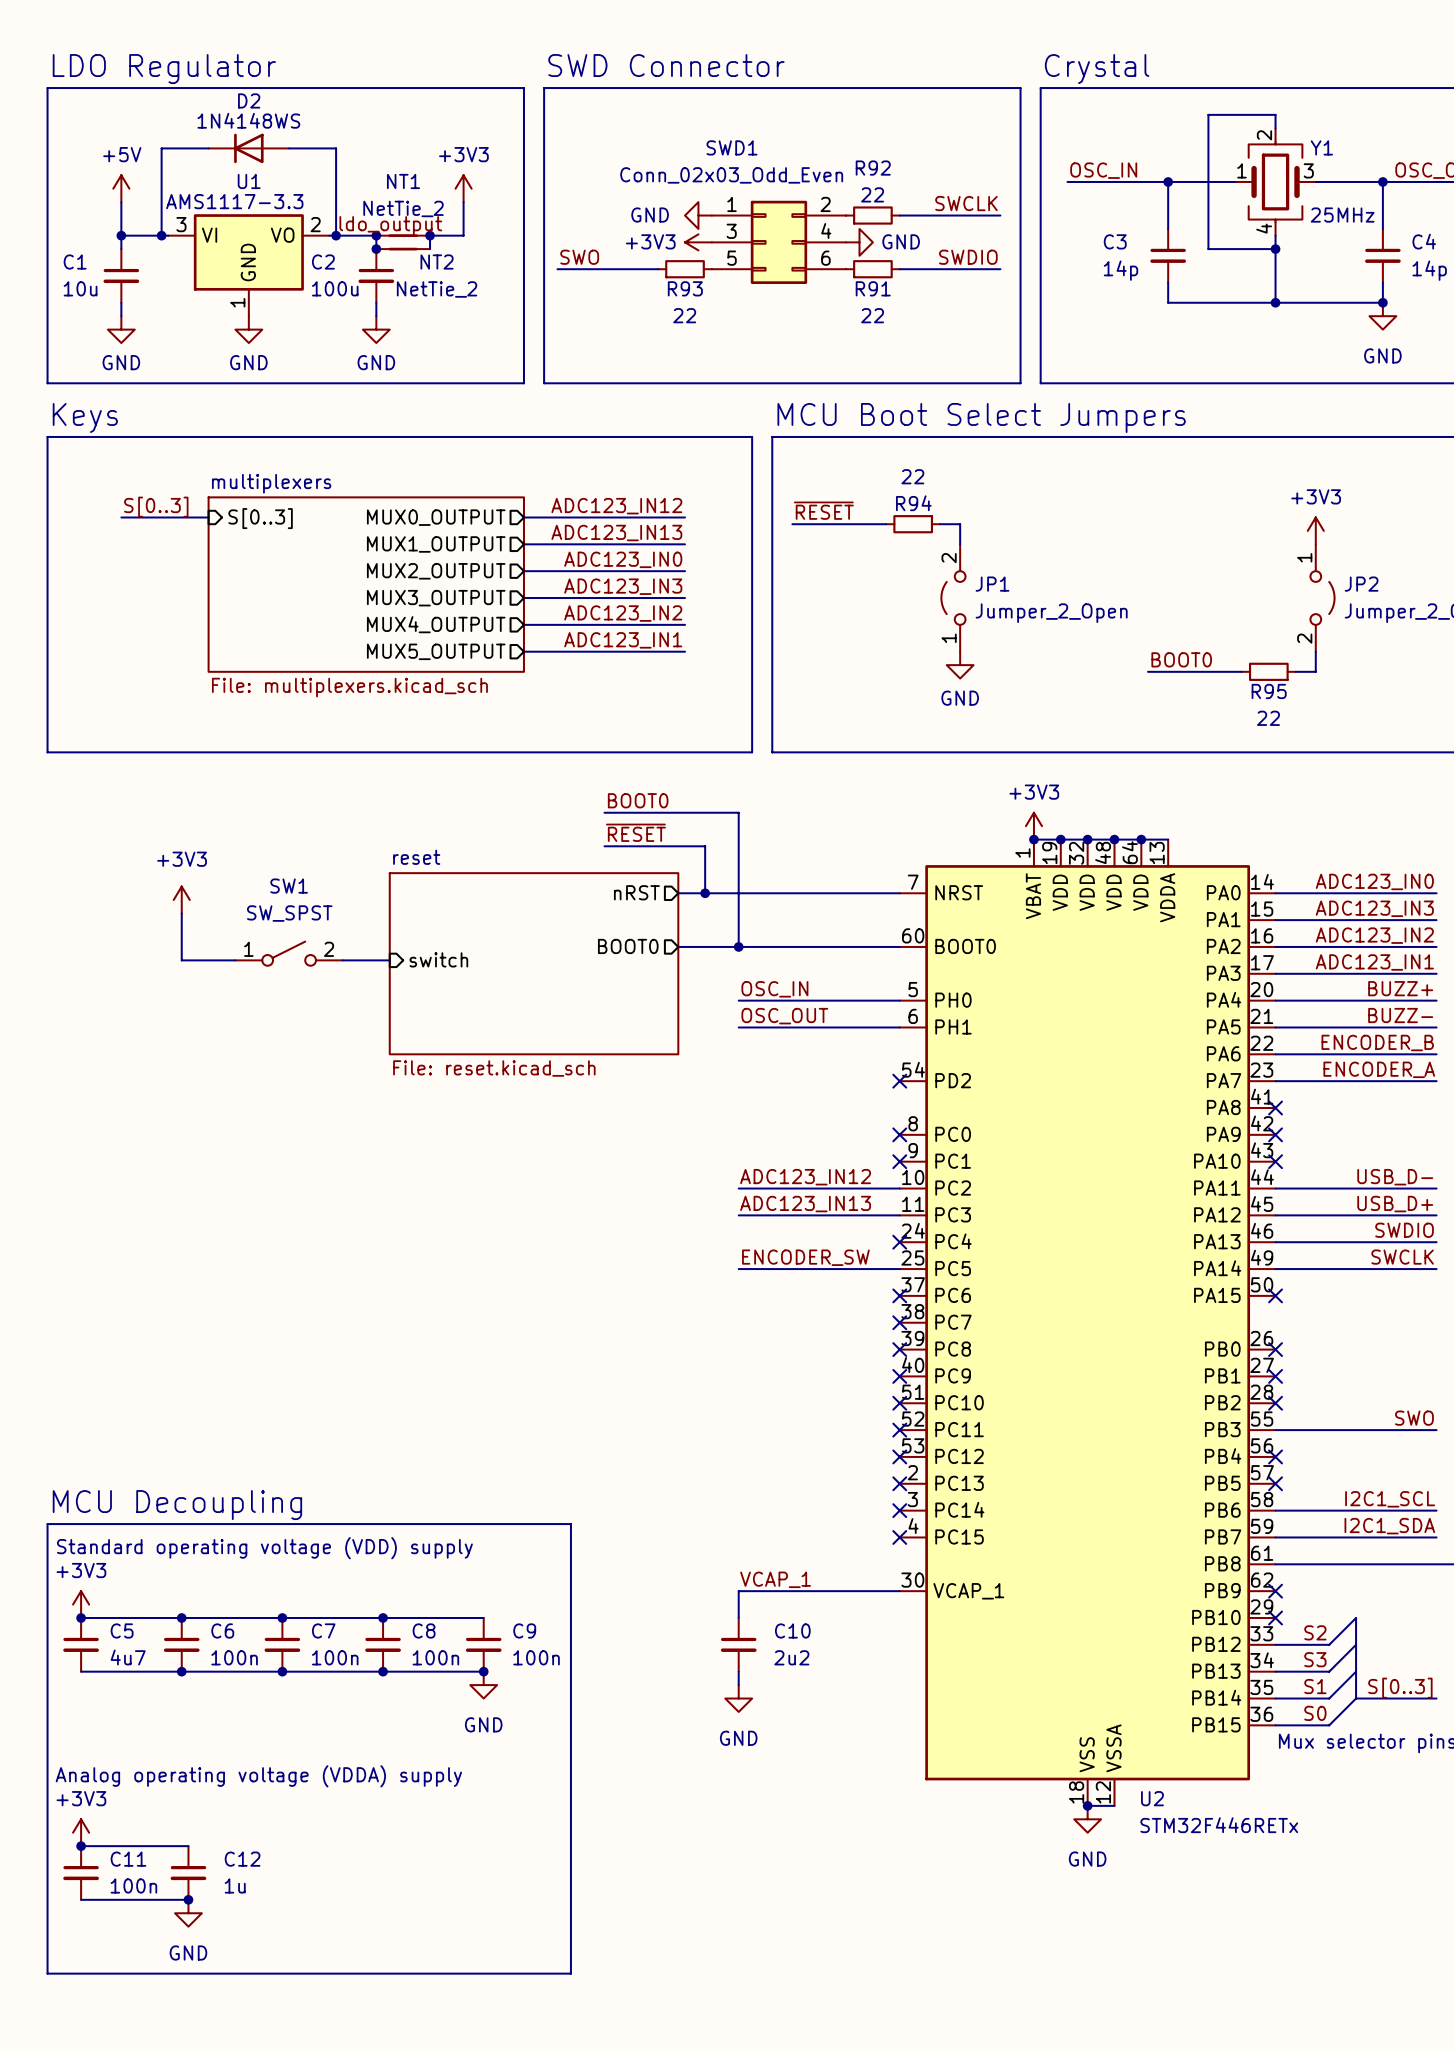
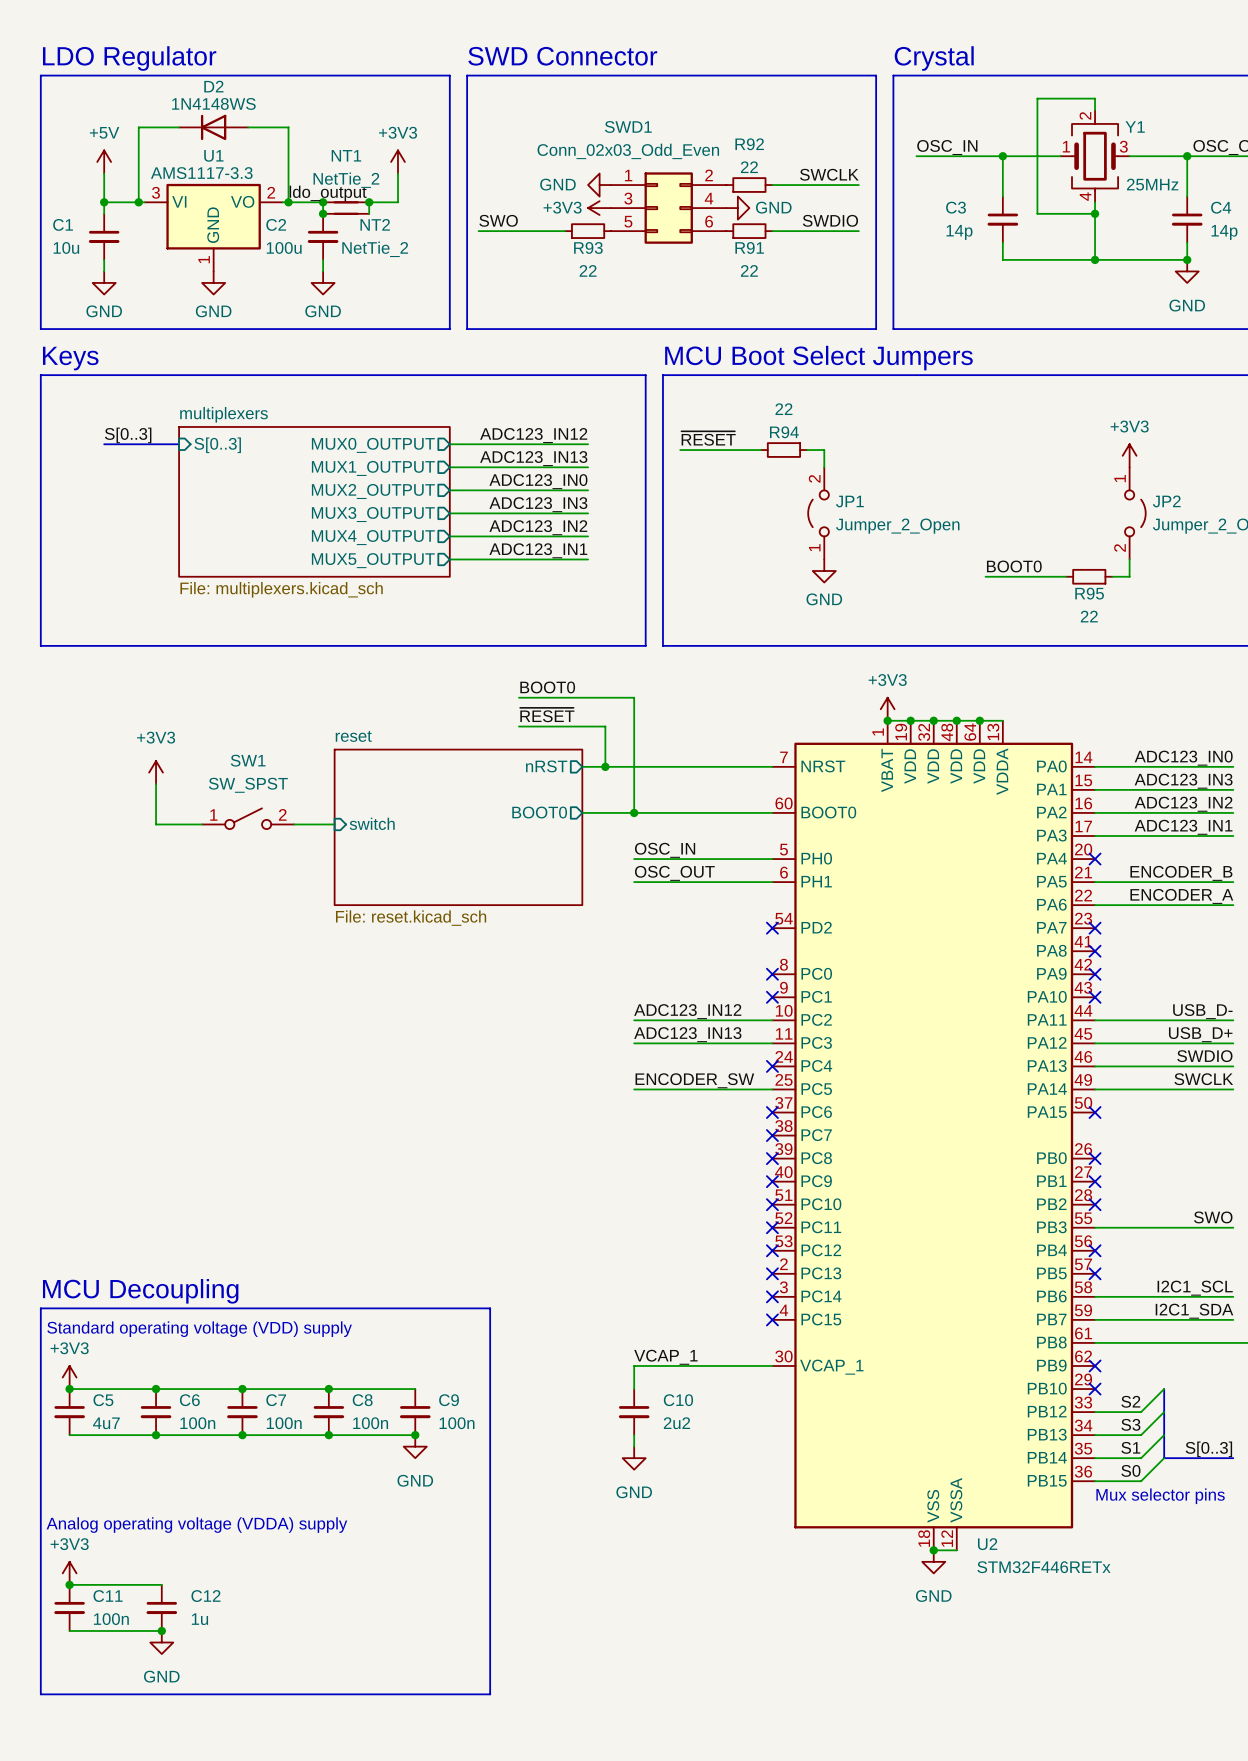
label: BUZZ+ (1400, 988) -> none
wire: (1275, 1000) (1436, 1000) -> none
no-connect mark: none -> (1095, 859)
label: BUZZ- (1400, 1015) -> ENCODER_B (1181, 873)
label: ENCODER_B (1377, 1042) -> ENCODER_A (1181, 896)
label: ENCODER_A (1379, 1069) -> none
wire: (1275, 1081) (1436, 1081) -> none
no-connect mark: none -> (1095, 928)

